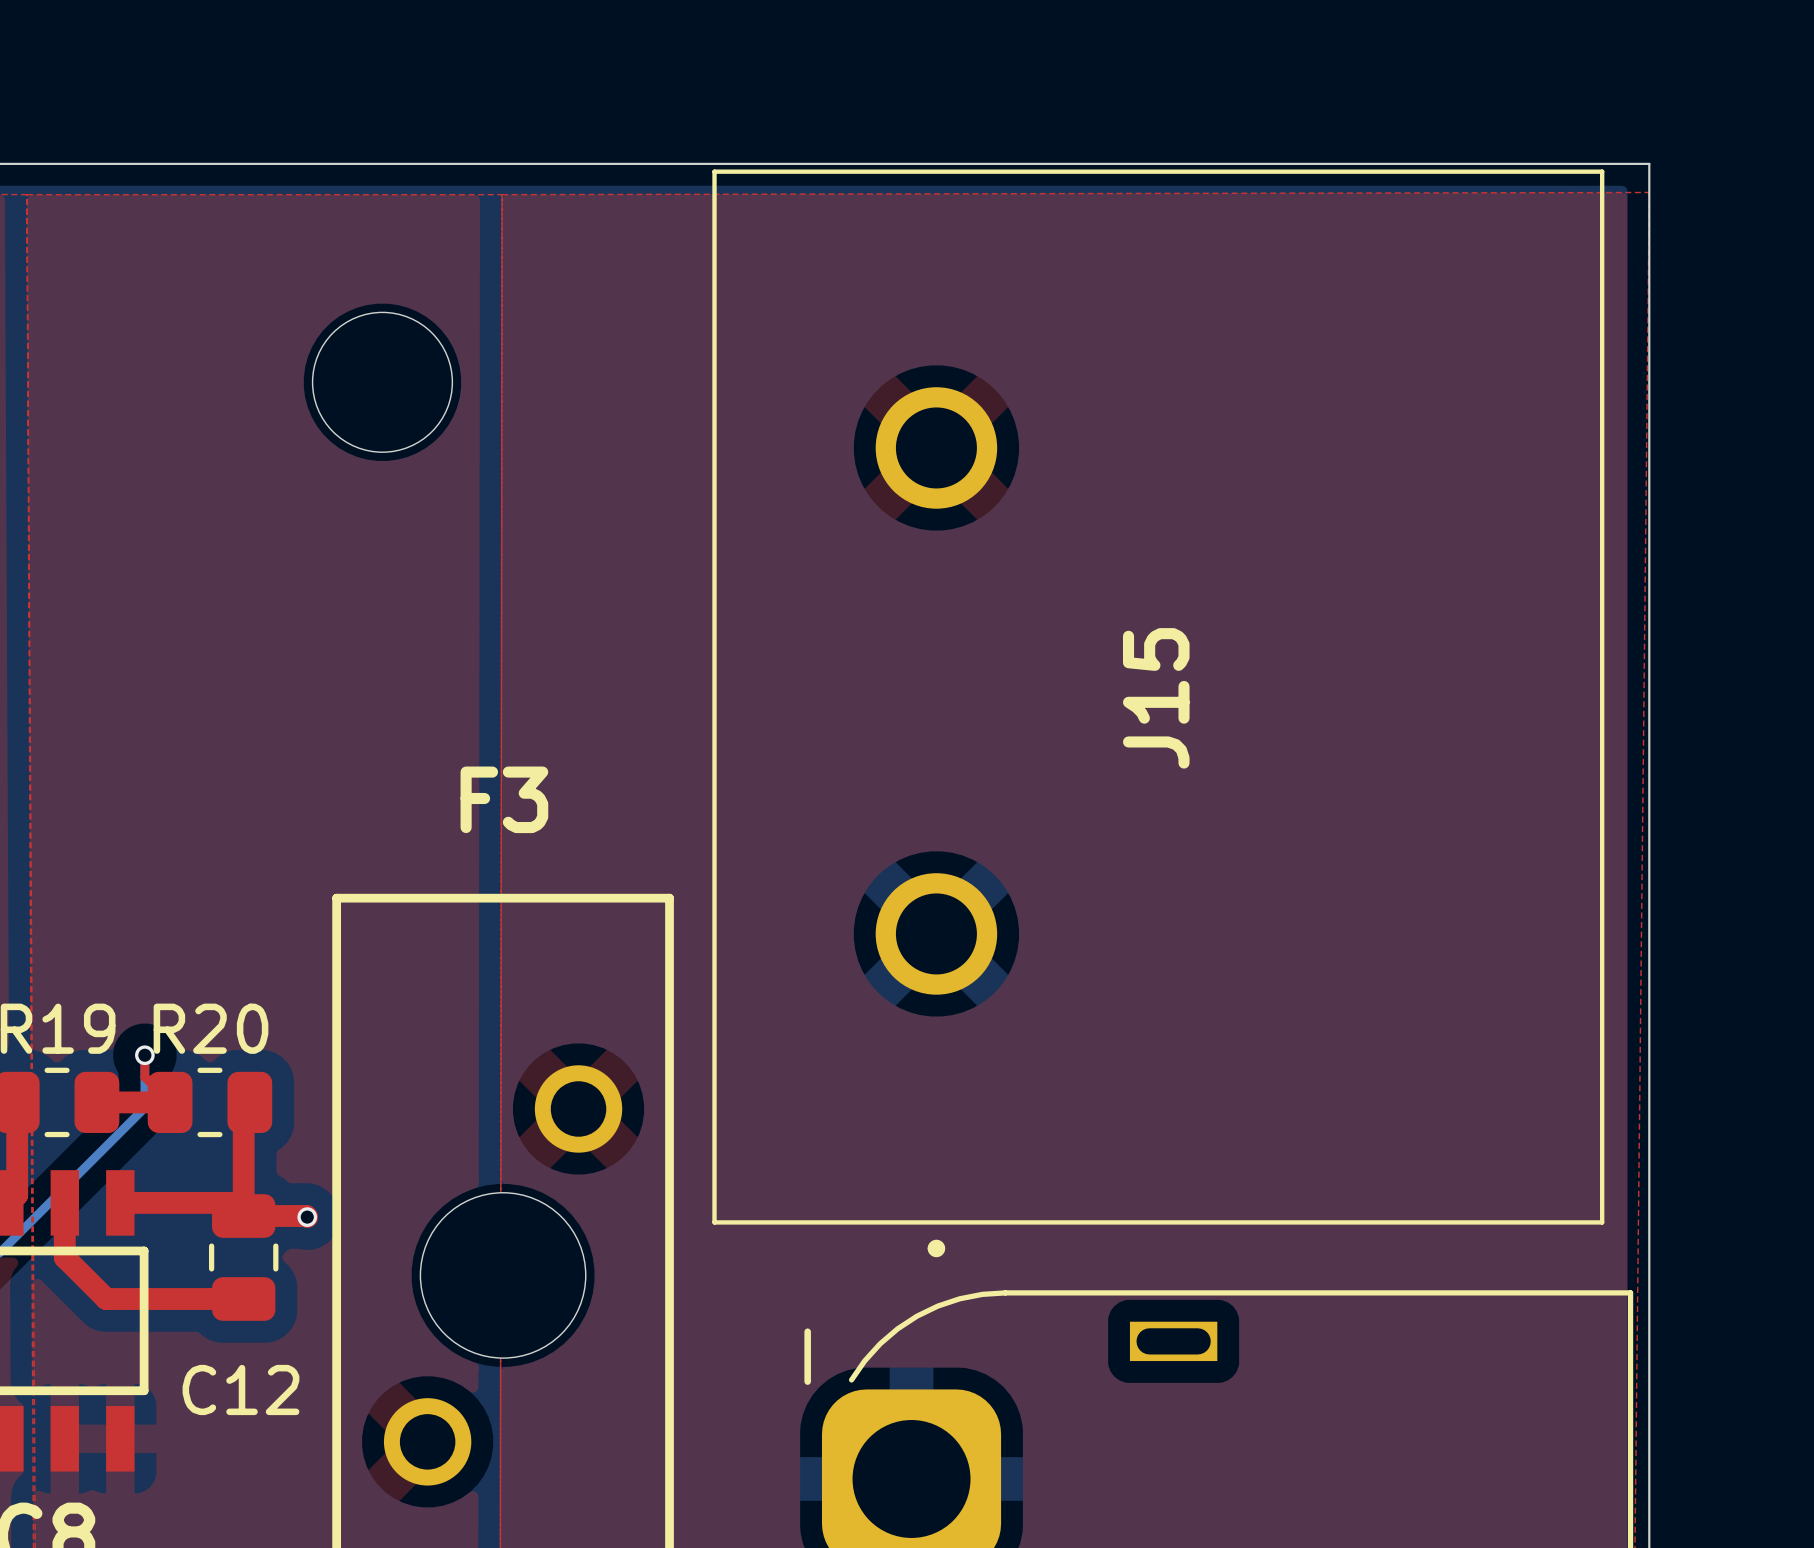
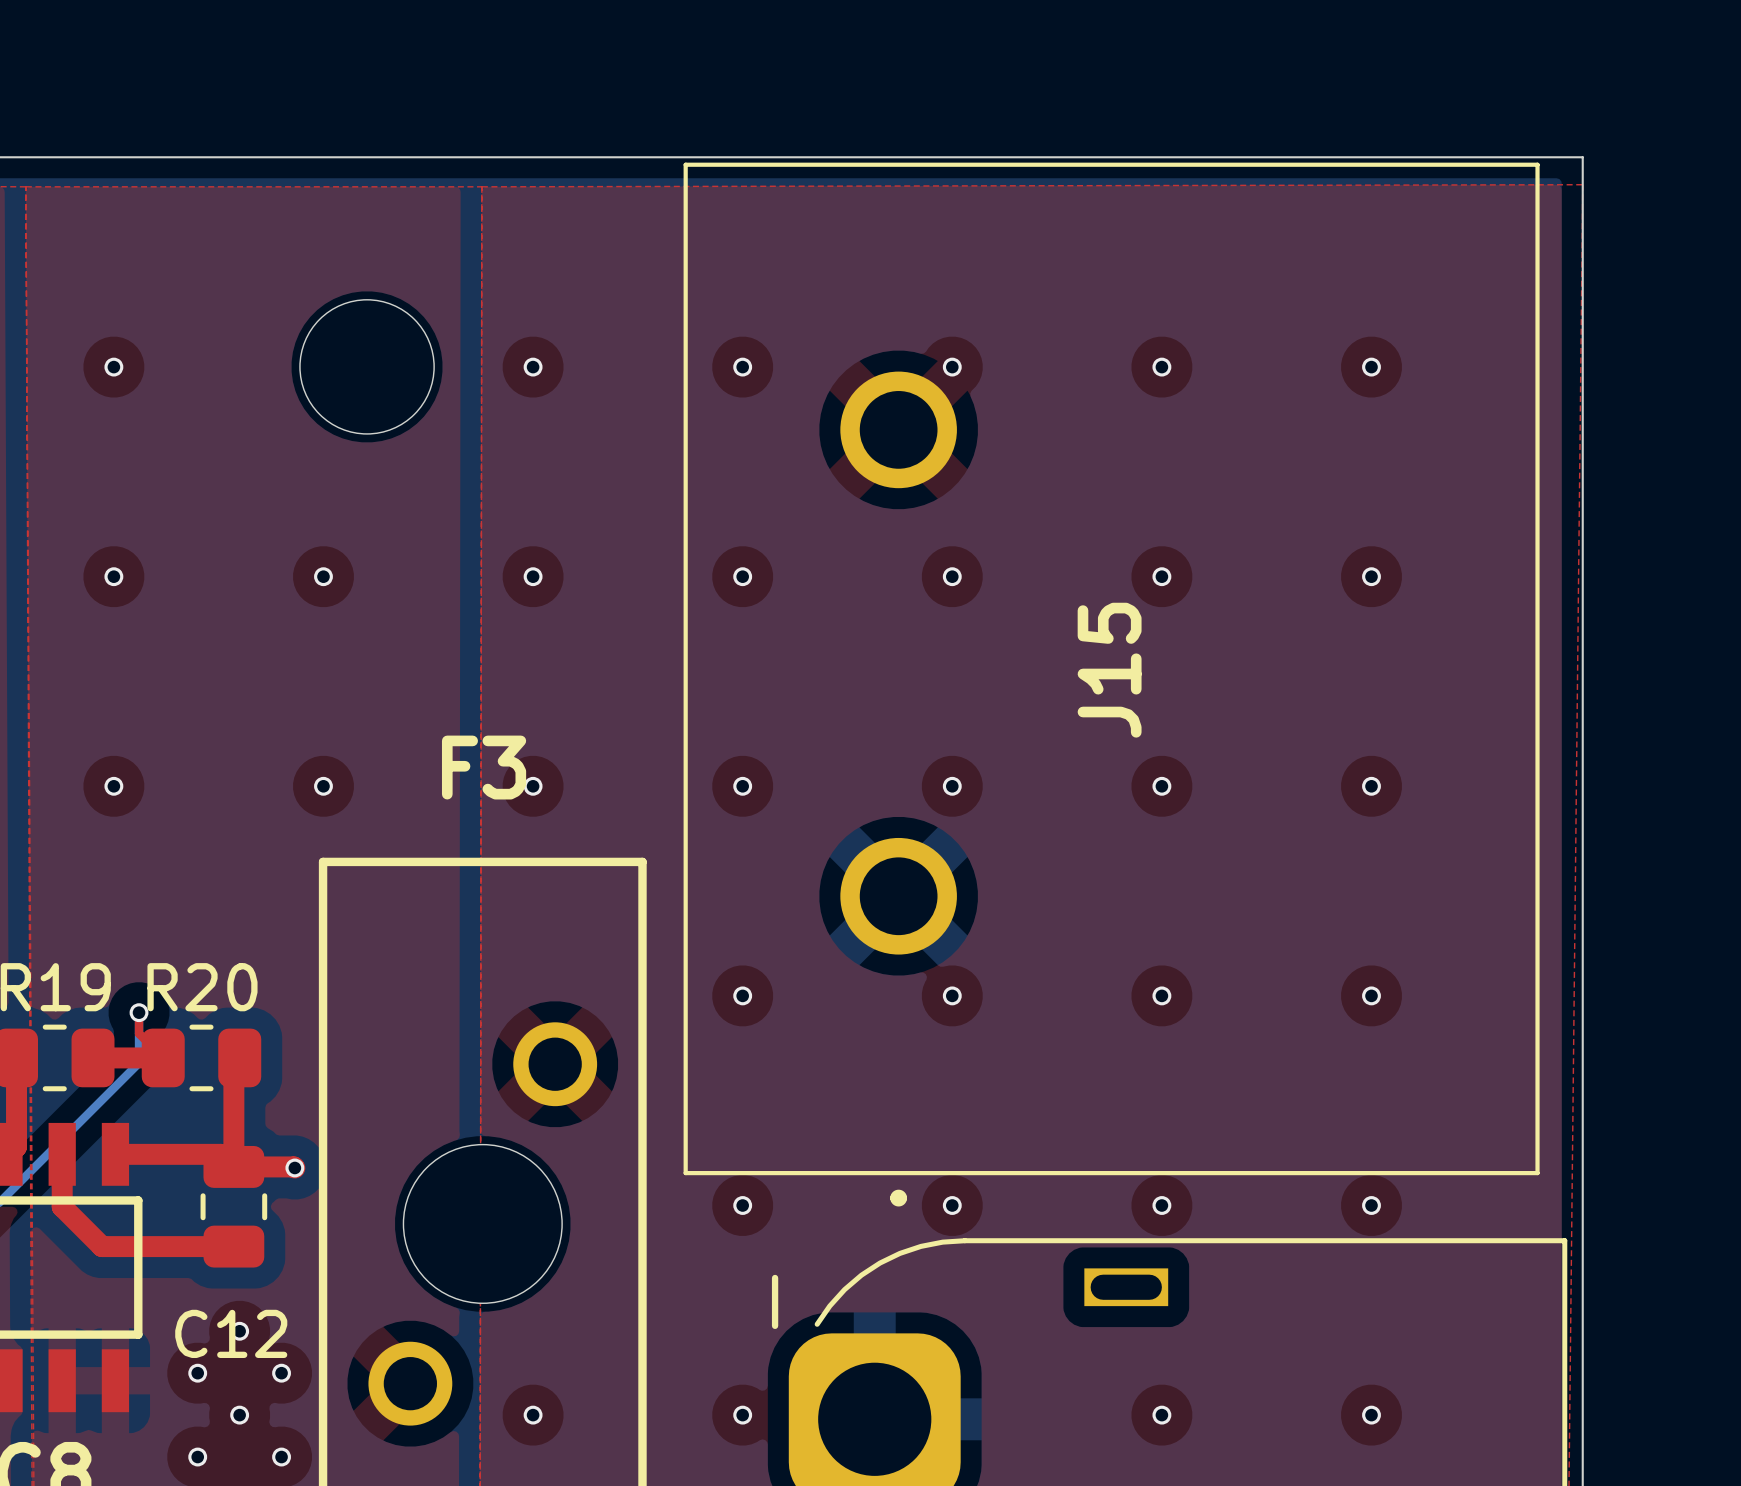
via: none -> (113, 367)
via: none -> (533, 367)
via: none -> (742, 367)
via: none -> (952, 367)
via: none -> (1161, 367)
via: none -> (1371, 367)
via: none -> (113, 576)
via: none -> (323, 576)
via: none -> (533, 576)
via: none -> (742, 576)
via: none -> (952, 576)
via: none -> (1161, 576)
via: none -> (1371, 576)
via: none -> (113, 786)
via: none -> (323, 786)
via: none -> (533, 786)
via: none -> (742, 786)
via: none -> (952, 786)
via: none -> (1161, 786)
via: none -> (1371, 786)
via: none -> (742, 995)
via: none -> (952, 995)
via: none -> (1161, 995)
via: none -> (1371, 995)
via: none -> (742, 1205)
via: none -> (952, 1205)
via: none -> (1161, 1205)
via: none -> (1371, 1205)
via: none -> (239, 1331)
via: none -> (197, 1373)
via: none -> (281, 1373)
via: none -> (239, 1415)
via: none -> (533, 1415)
via: none -> (742, 1415)
via: none -> (1161, 1415)
via: none -> (1371, 1415)
via: none -> (197, 1457)
via: none -> (281, 1457)

